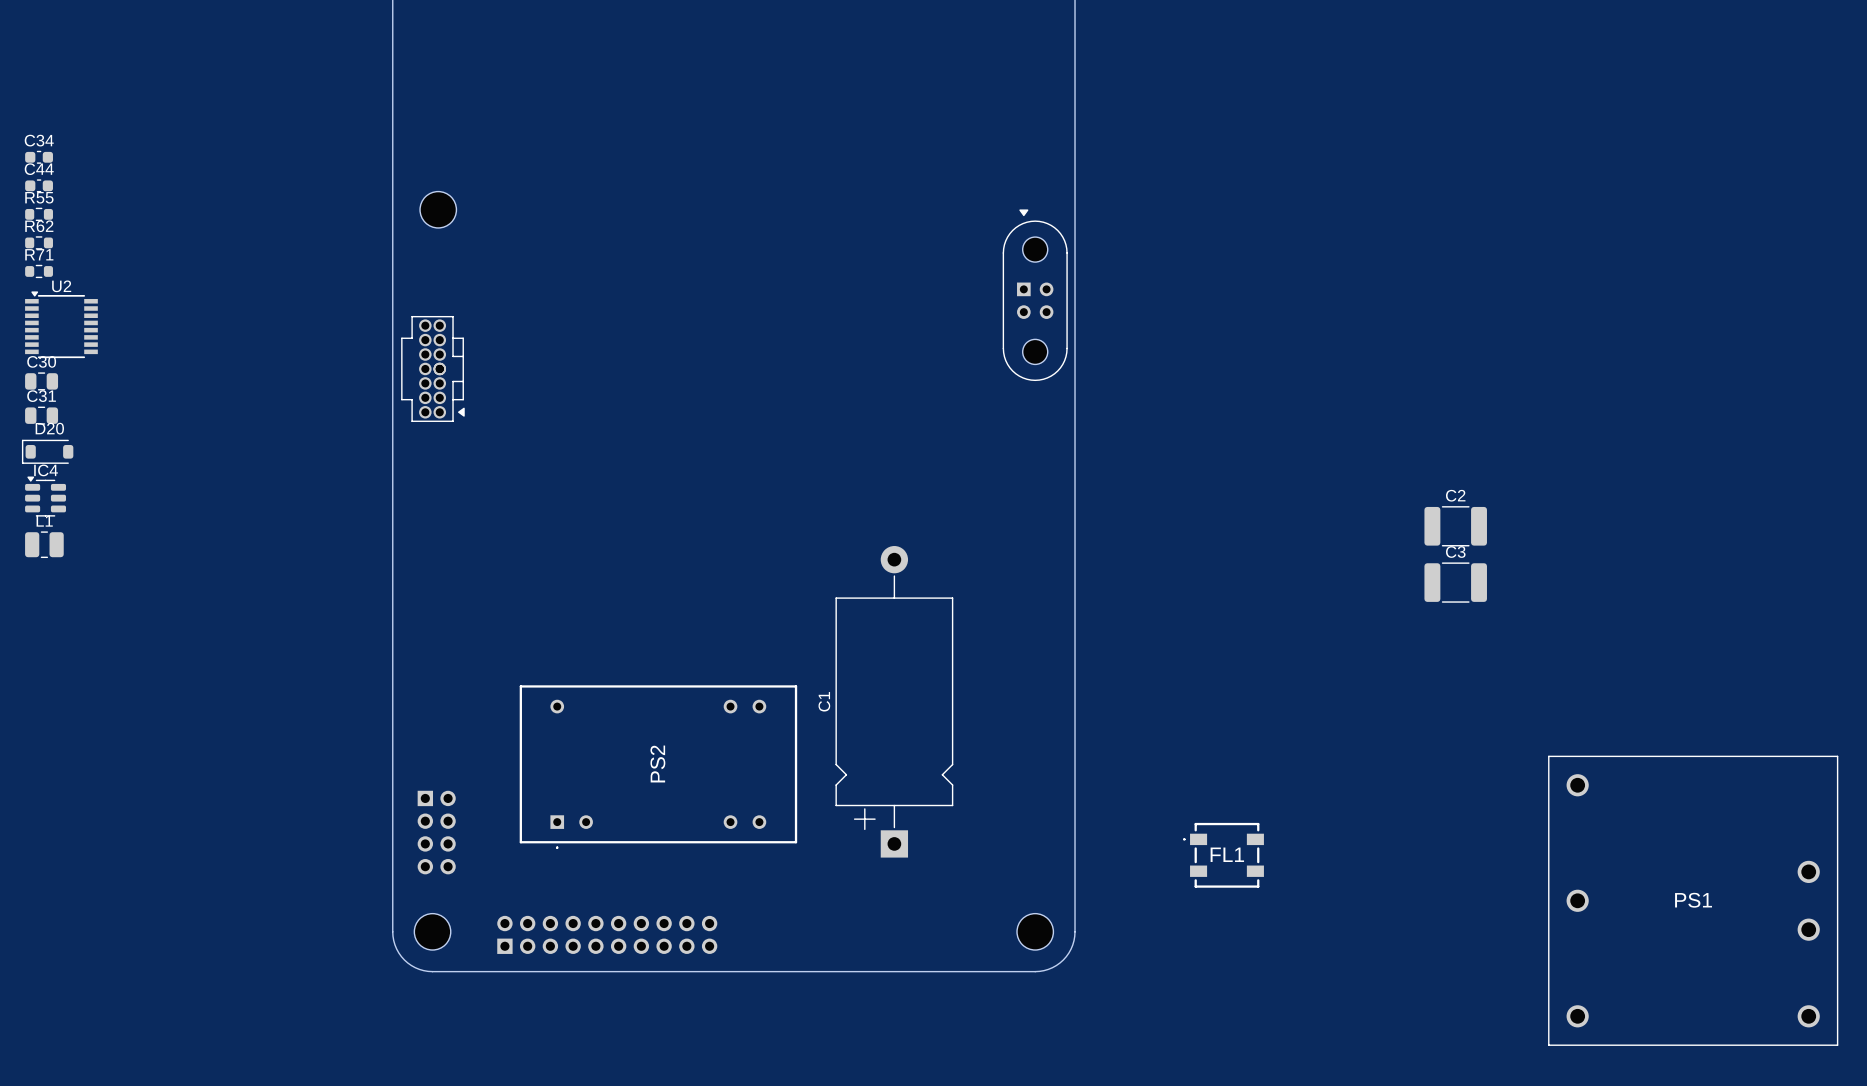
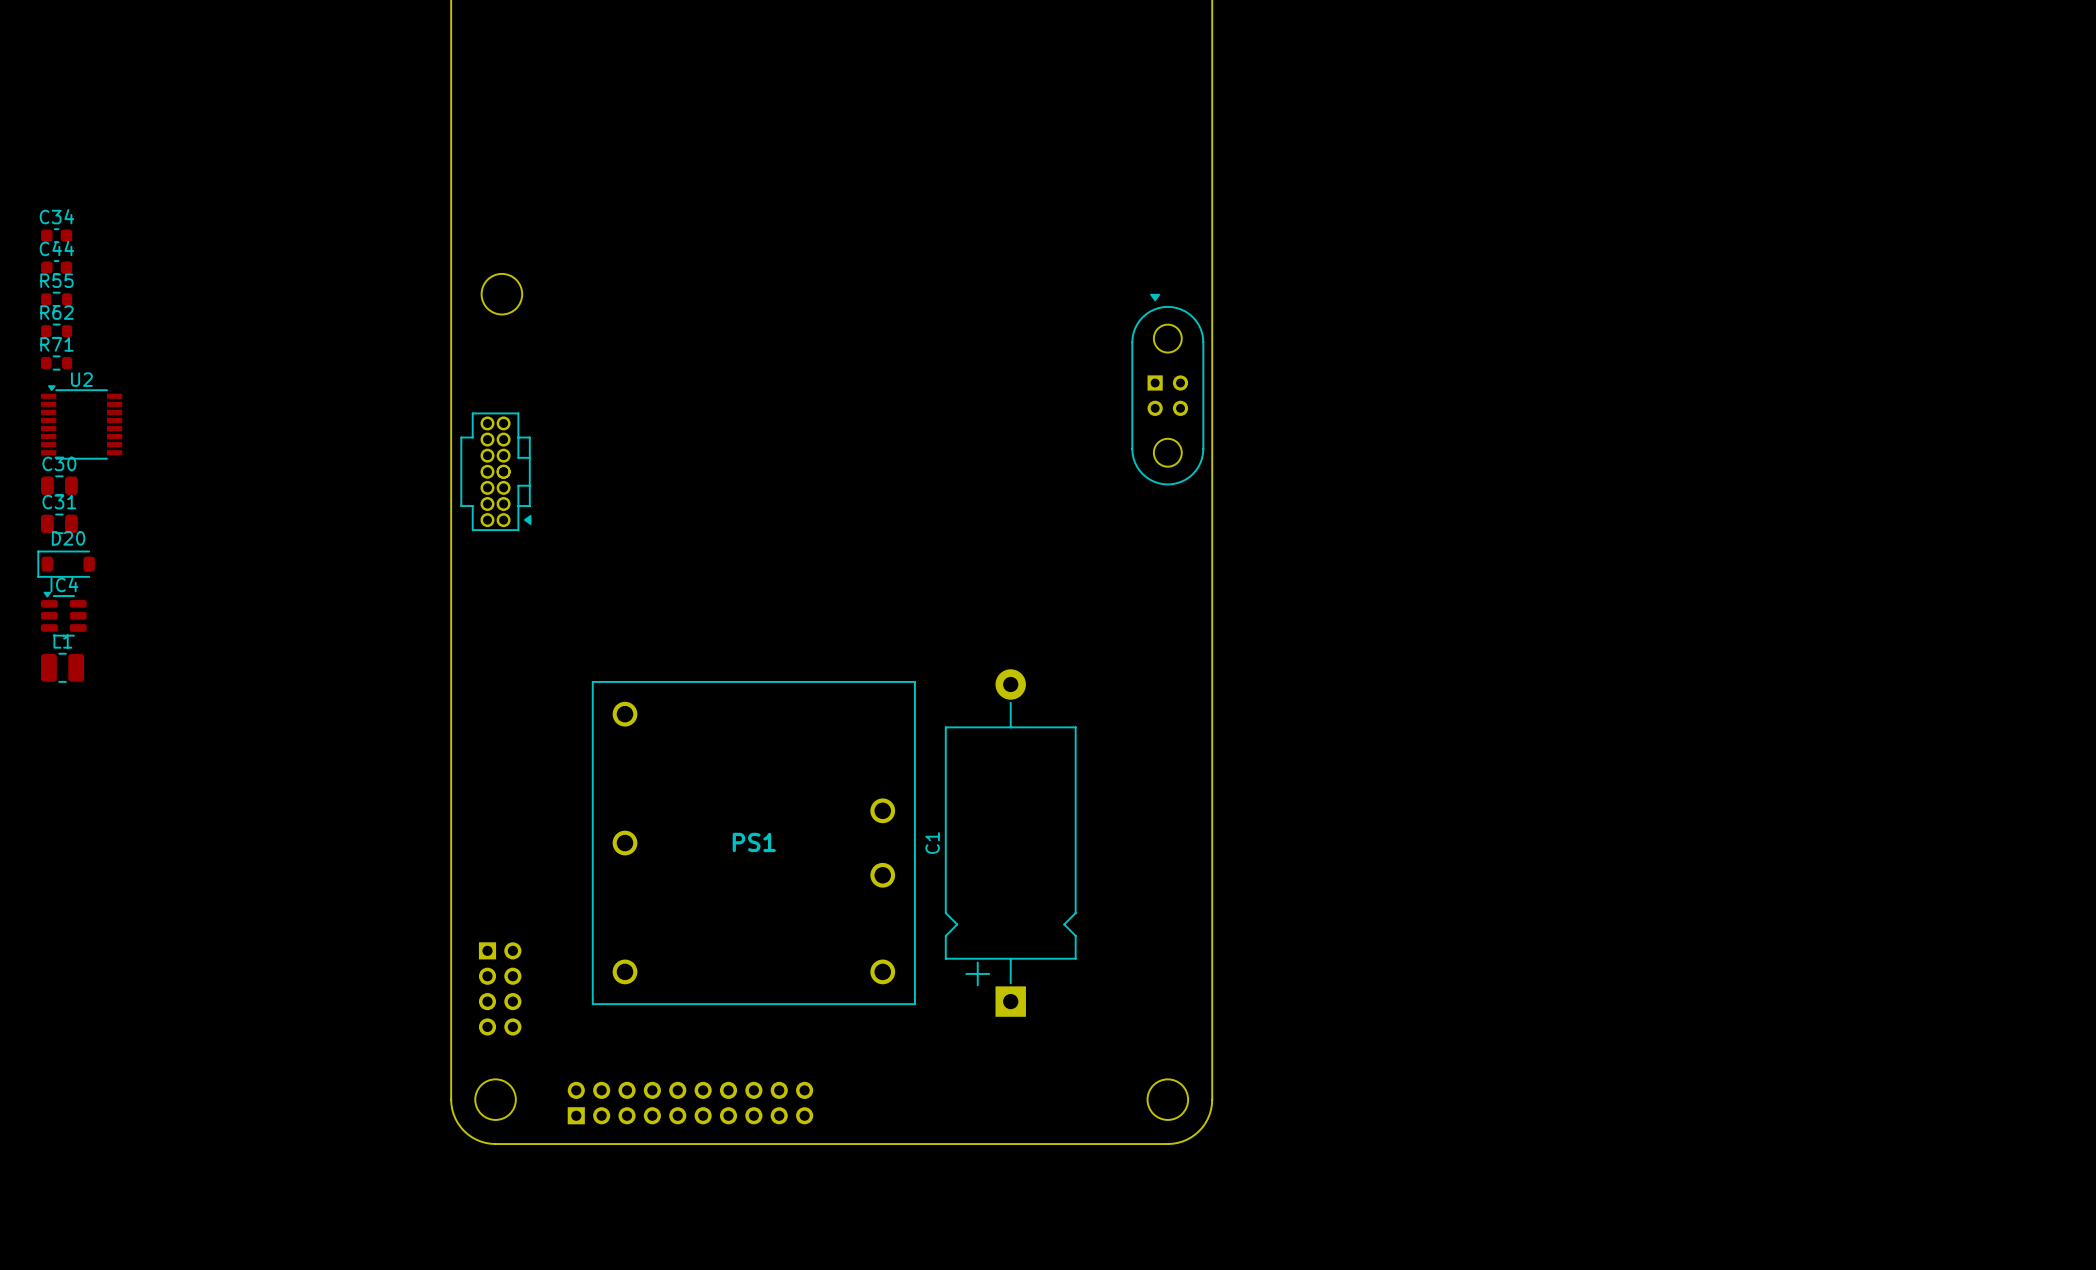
C2: (1455, 526) -> none
C3: (1455, 582) -> none
PS2: (658, 767) -> none
FL1: (1223, 855) -> none
PS1 position: (1693, 900) -> (753, 843)

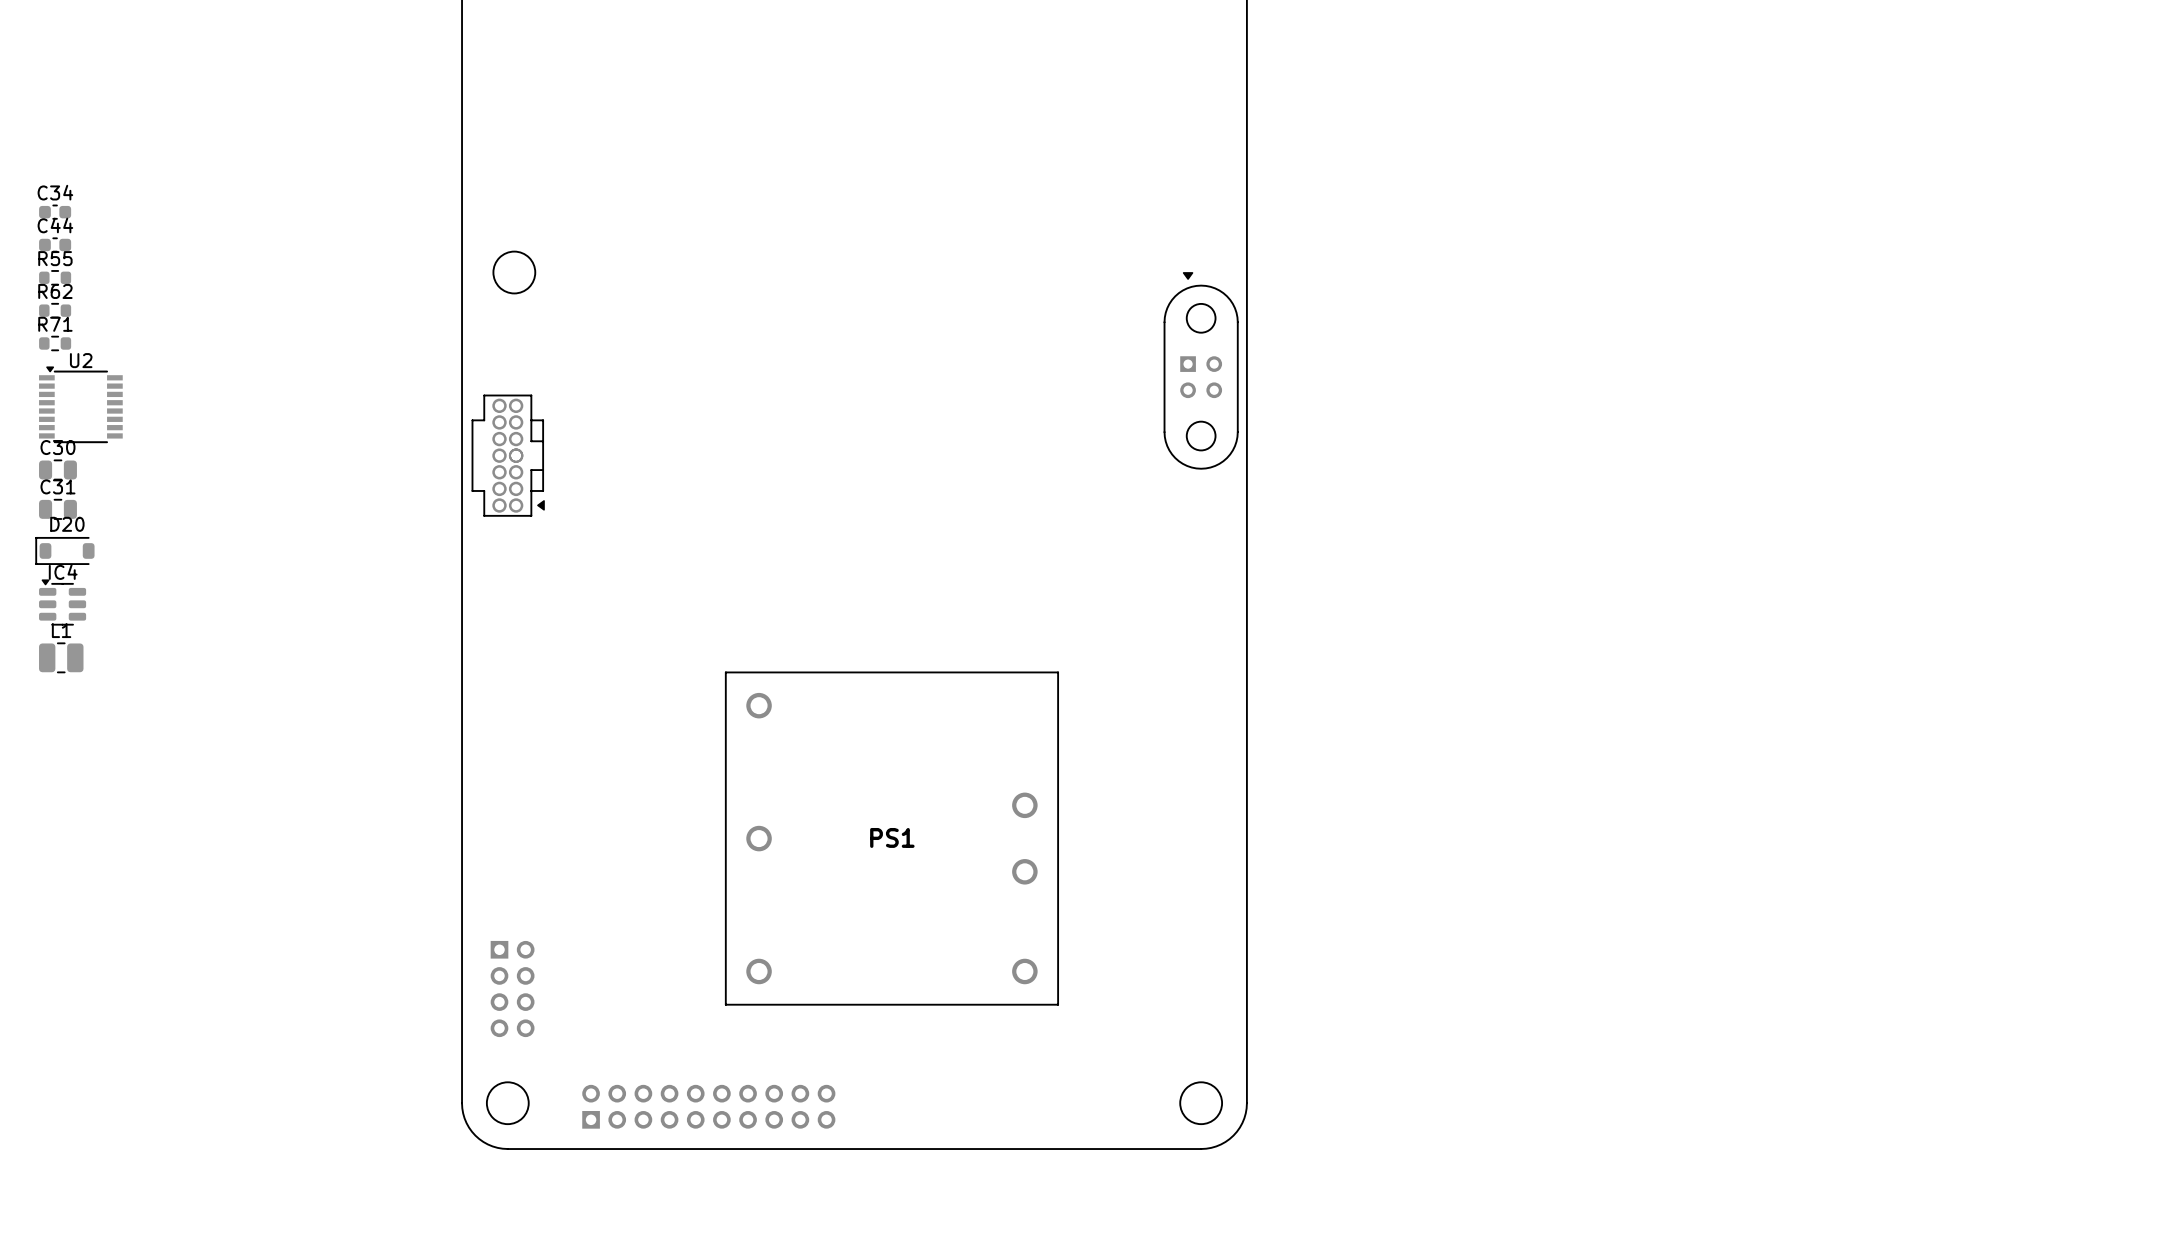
PS1 position: (753, 843) -> (891, 838)
C1: (1010, 843) -> none

